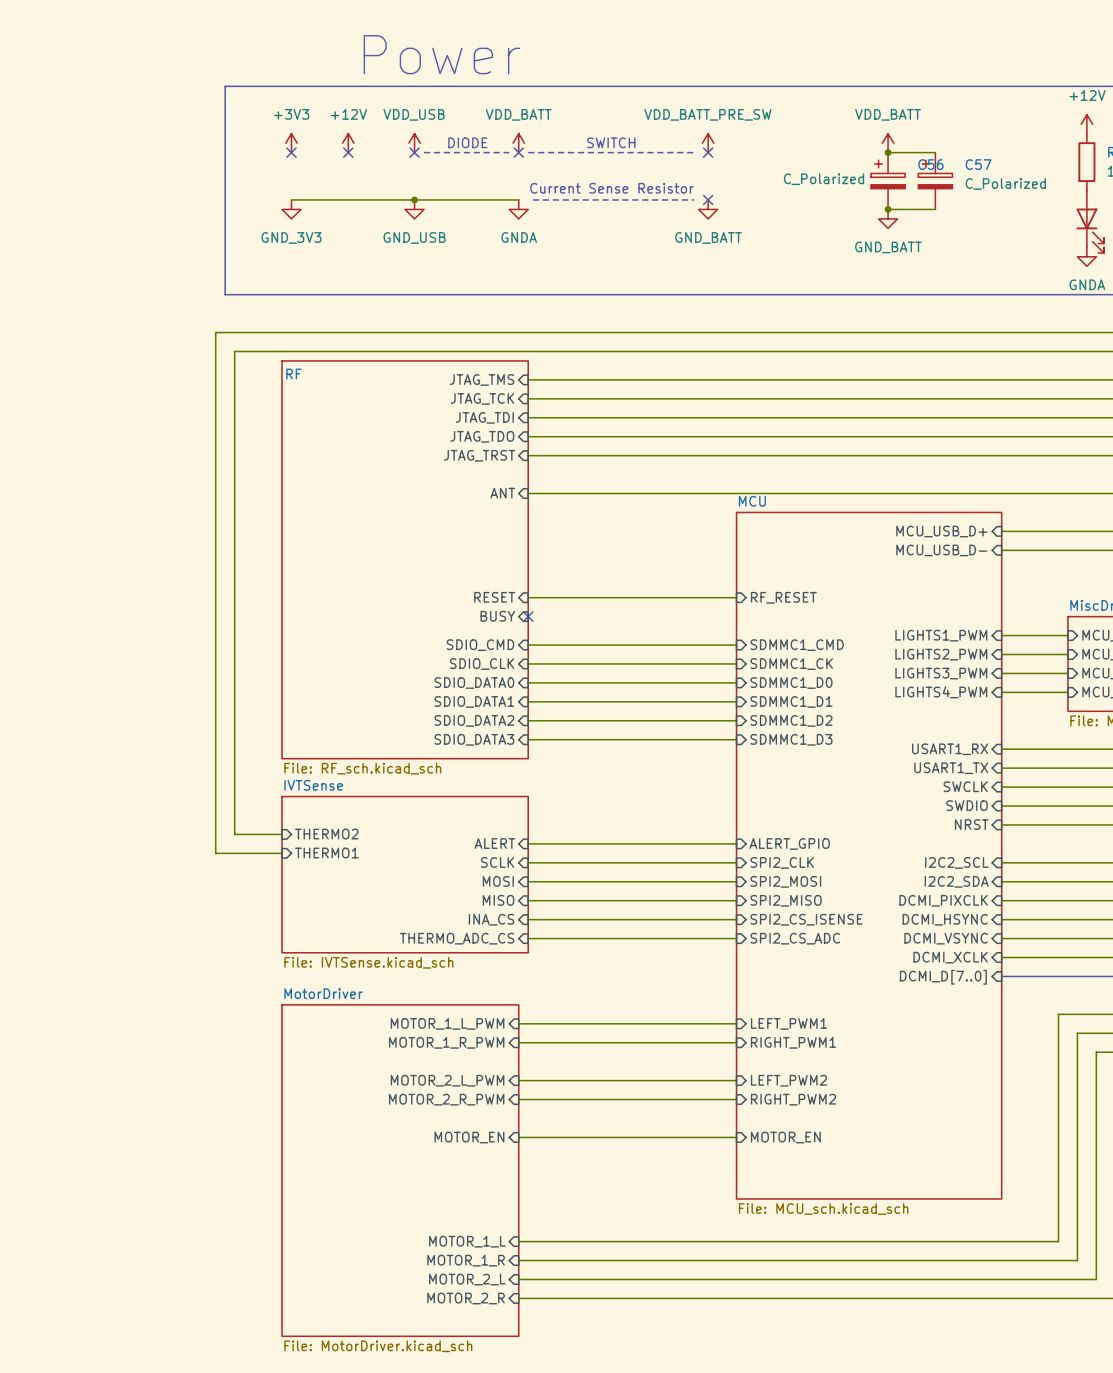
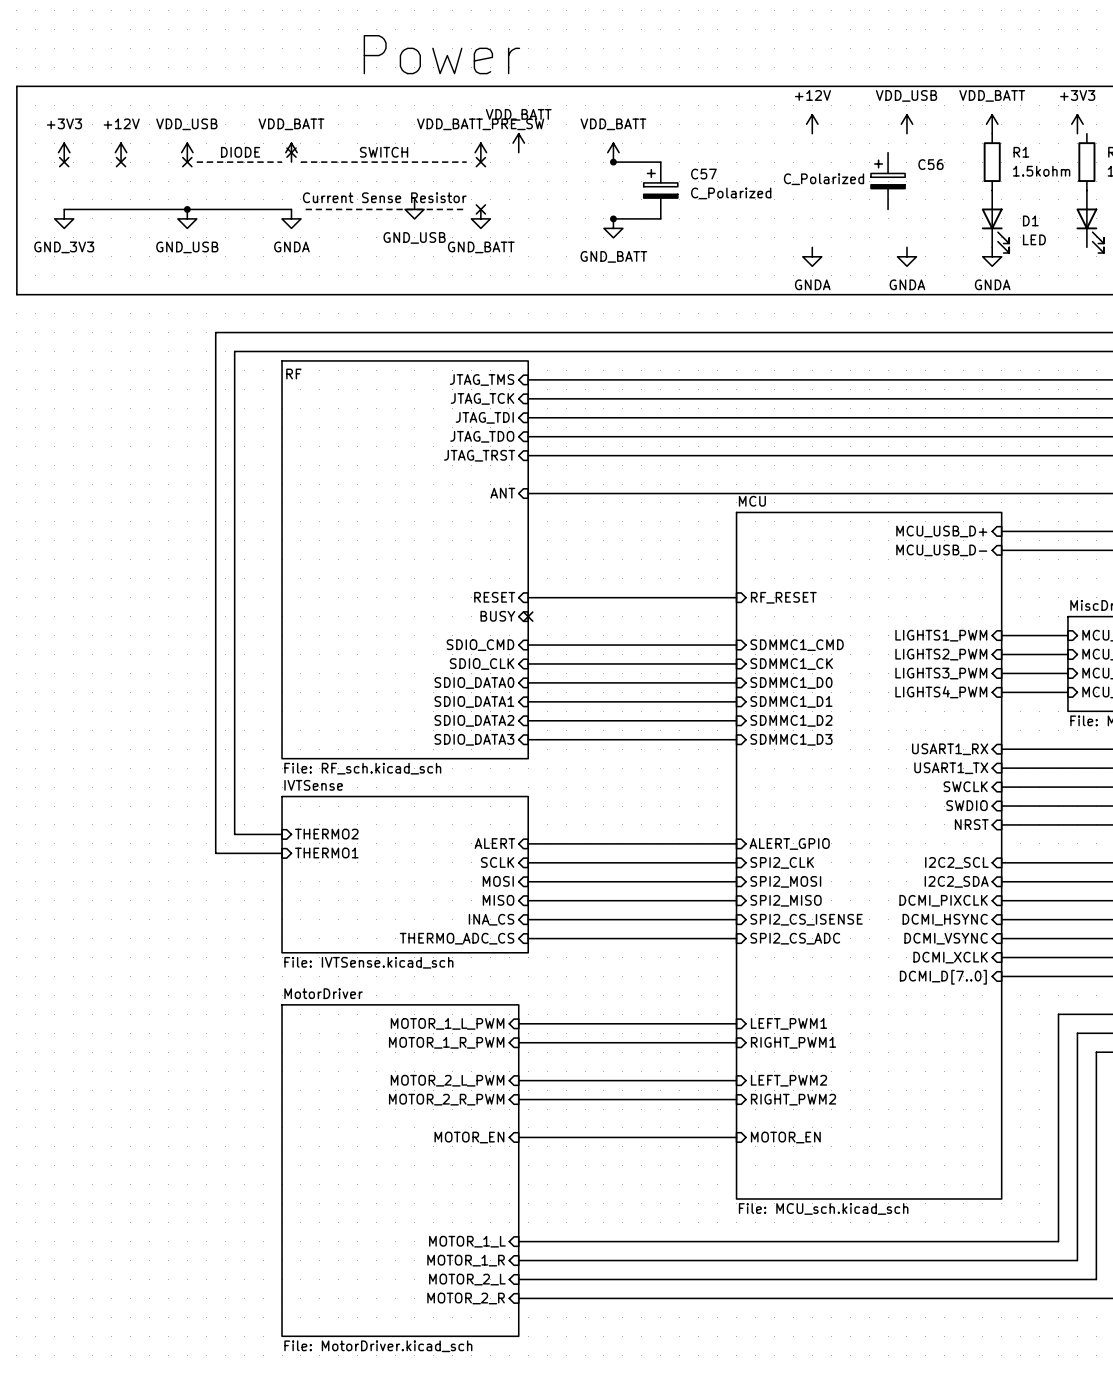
line: (225, 86) (225, 294) -> (225, 86) (16, 86) (16, 294) (225, 294)
power symbol: none -> +12V (812, 124)
power symbol: none -> VDD_USB (906, 124)
power symbol: none -> +3V3 (1077, 124)
power symbol: +12V (1086, 124) -> none
text: DIODE (467, 142) -> none
text: SWITCH (611, 142) -> none
power symbol: +3V3 (291, 143) -> none
power symbol: +12V (348, 143) -> none
power symbol: VDD_USB (414, 143) -> none
power symbol: VDD_BATT_PRE_SW (708, 143) -> none
power symbol position: VDD_BATT (888, 143) -> VDD_BATT (992, 124)
power symbol: none -> +3V3 (64, 152)
power symbol: none -> +12V (121, 152)
power symbol: none -> VDD_USB (187, 152)
text: none -> DIODE (240, 152)
power symbol: none -> VDD_BATT (291, 152)
no-connect mark: (348, 152) -> none
text: none -> SWITCH (384, 152)
no-connect mark: (414, 152) -> none
line: (424, 152) (509, 152) -> none
power symbol: none -> VDD_BATT_PRE_SW (480, 152)
no-connect mark: (518, 152) -> none
line: (528, 152) (693, 152) -> none
power symbol: none -> VDD_BATT (613, 152)
no-connect mark: (708, 152) -> none
wire: (888, 152) (935, 152) -> none
junction: (888, 152) -> none
no-connect mark: none -> (64, 162)
no-connect mark: none -> (121, 162)
no-connect mark: none -> (187, 162)
line: none -> (196, 162) (282, 162)
line: none -> (300, 162) (466, 162)
no-connect mark: none -> (480, 162)
wire: none -> (613, 162) (660, 162)
junction: none -> (613, 162)
R1: none -> 1.5kohm (992, 162)
C57 position: (935, 181) -> (660, 190)
text: Current Sense Resistor (611, 188) -> none
text: none -> Current Sense Resistor (384, 197)
wire: (291, 199) (518, 199) -> none
junction: (414, 199) -> none
line: (532, 199) (693, 199) -> none
no-connect mark: (708, 199) -> none
wire: none -> (64, 209) (291, 209)
junction: none -> (187, 209)
power symbol: GND_3V3 (291, 209) -> none
line: none -> (305, 209) (466, 209)
no-connect mark: none -> (480, 209)
power symbol: GNDA (518, 209) -> none
power symbol position: GND_BATT (708, 209) -> GND_BATT (613, 228)
wire: (888, 209) (935, 209) -> none
junction: (888, 209) -> none
power symbol: none -> GND_3V3 (64, 218)
power symbol: none -> GND_USB (187, 218)
power symbol: none -> GNDA (291, 218)
power symbol: none -> GND_BATT (480, 218)
wire: none -> (613, 218) (660, 218)
junction: none -> (613, 218)
power symbol: GND_BATT (888, 218) -> none
D1: none -> LED (995, 221)
power symbol: none -> GNDA (812, 256)
power symbol: none -> GNDA (906, 256)
power symbol: none -> GNDA (992, 256)
power symbol: GNDA (1086, 256) -> none

